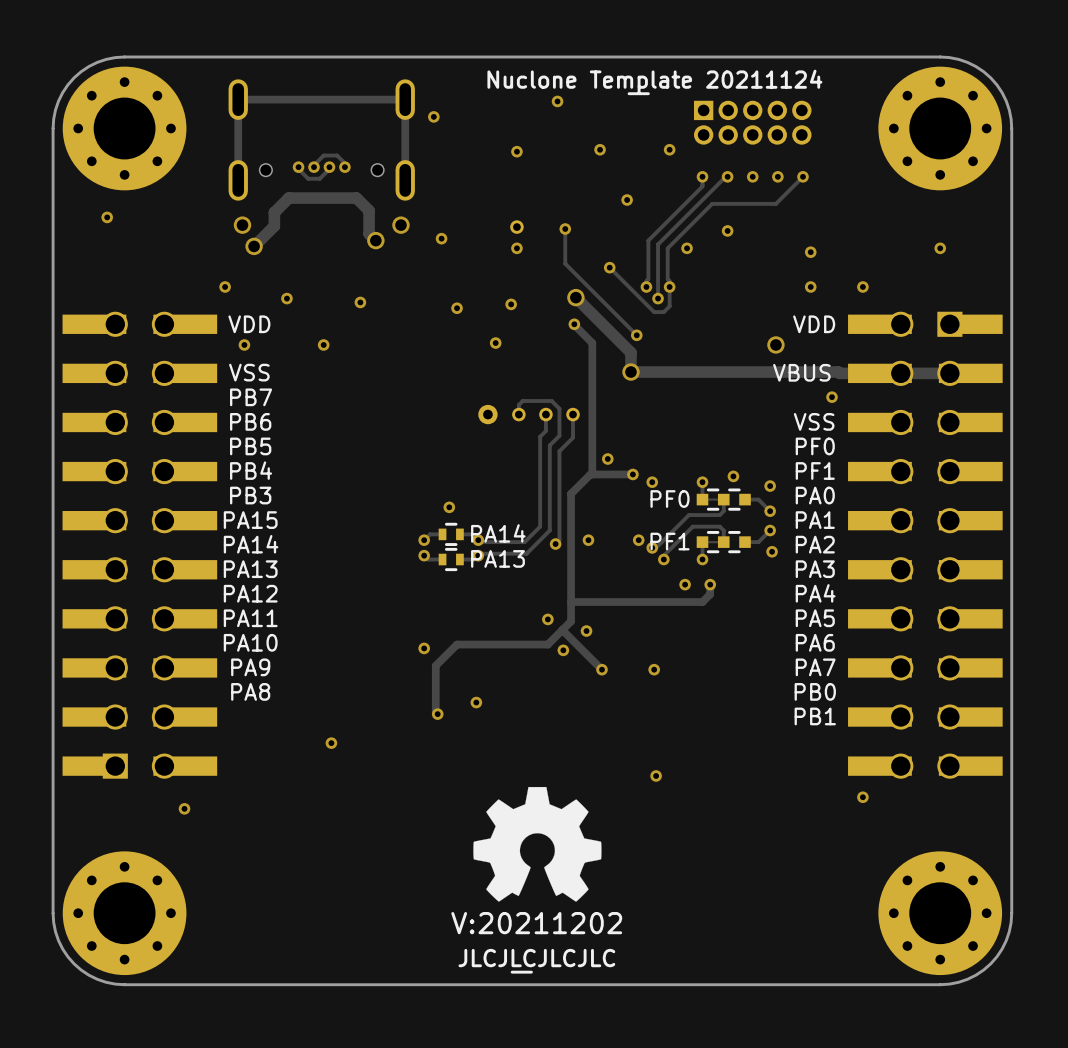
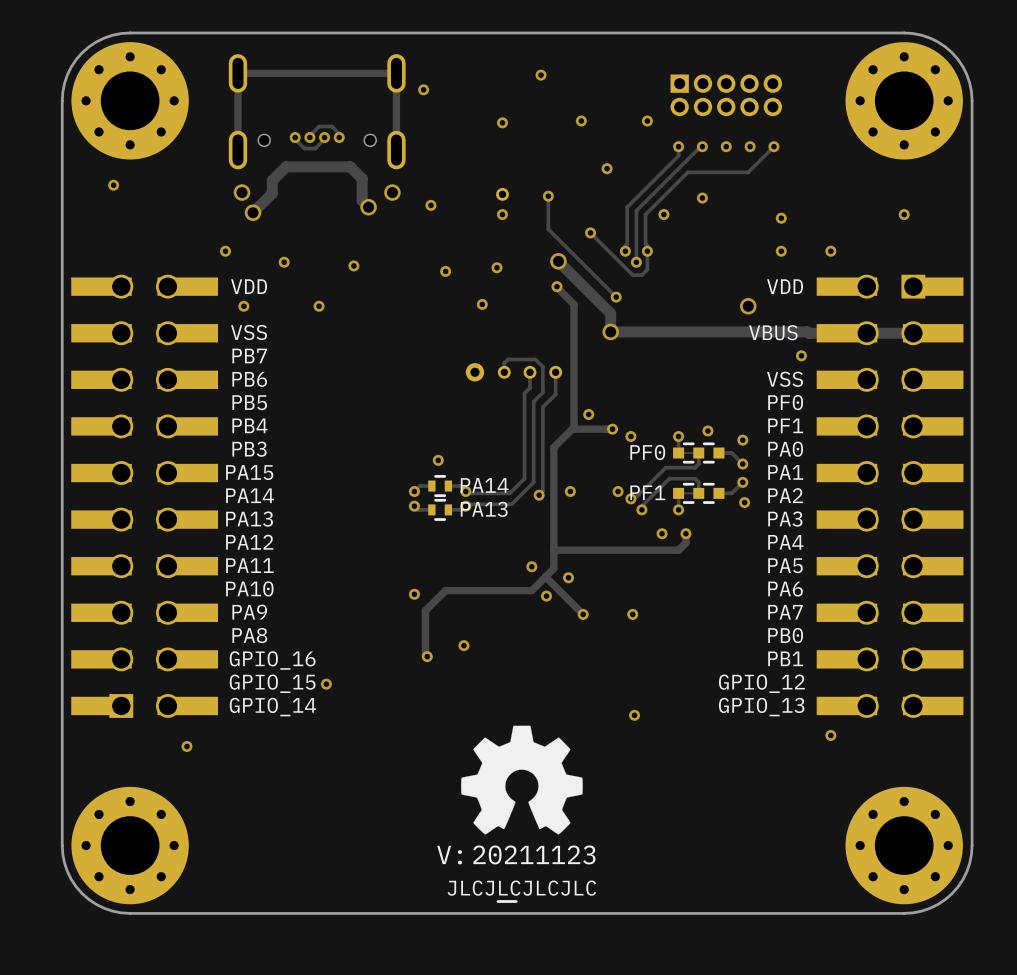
drawing: [627, 92, 650, 96] -> none
part text: none -> GPIO_16 (272, 660)
part text: none -> GPIO_15 (272, 683)
part text: none -> GPIO_12 (761, 683)
part text: none -> GPIO_14 (272, 707)
part text: none -> GPIO_13 (761, 707)
drawing shape: [451, 912, 623, 935] -> [437, 845, 596, 865]

